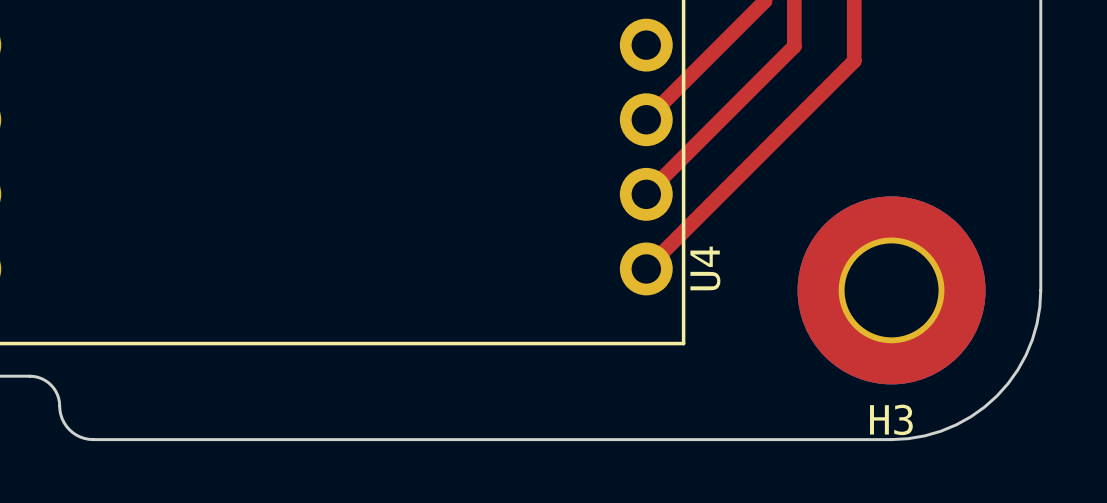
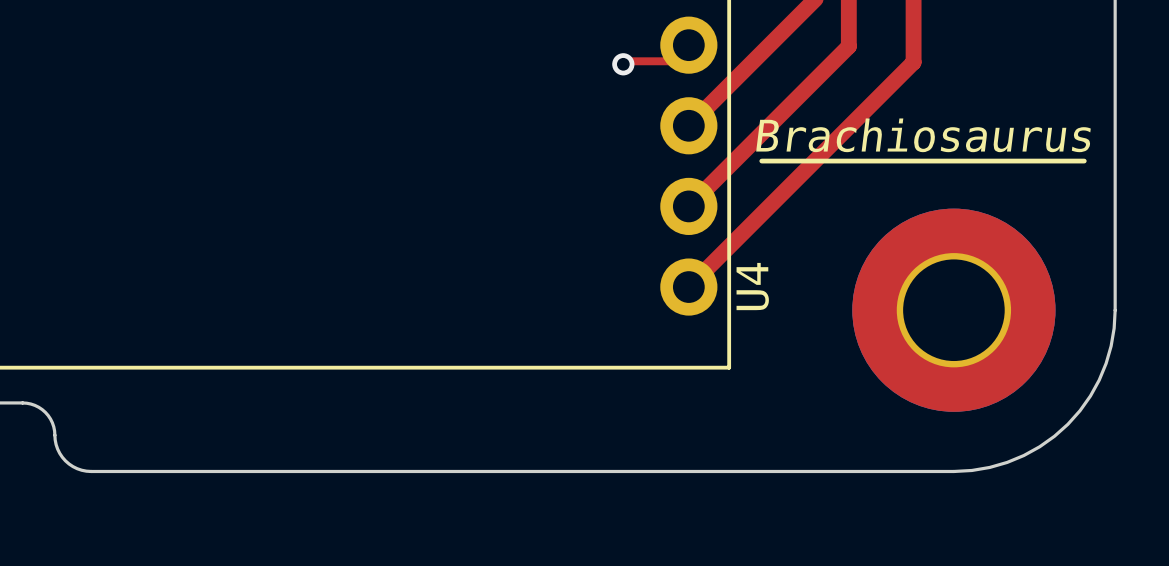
top track: none -> (672, 61) (626, 61) (623, 64)
via: none -> (623, 64)
text: none -> Brachiosaurus (923, 135)
line: none -> (761, 161) (1084, 161)
H3 name: H3 (891, 419) -> none

